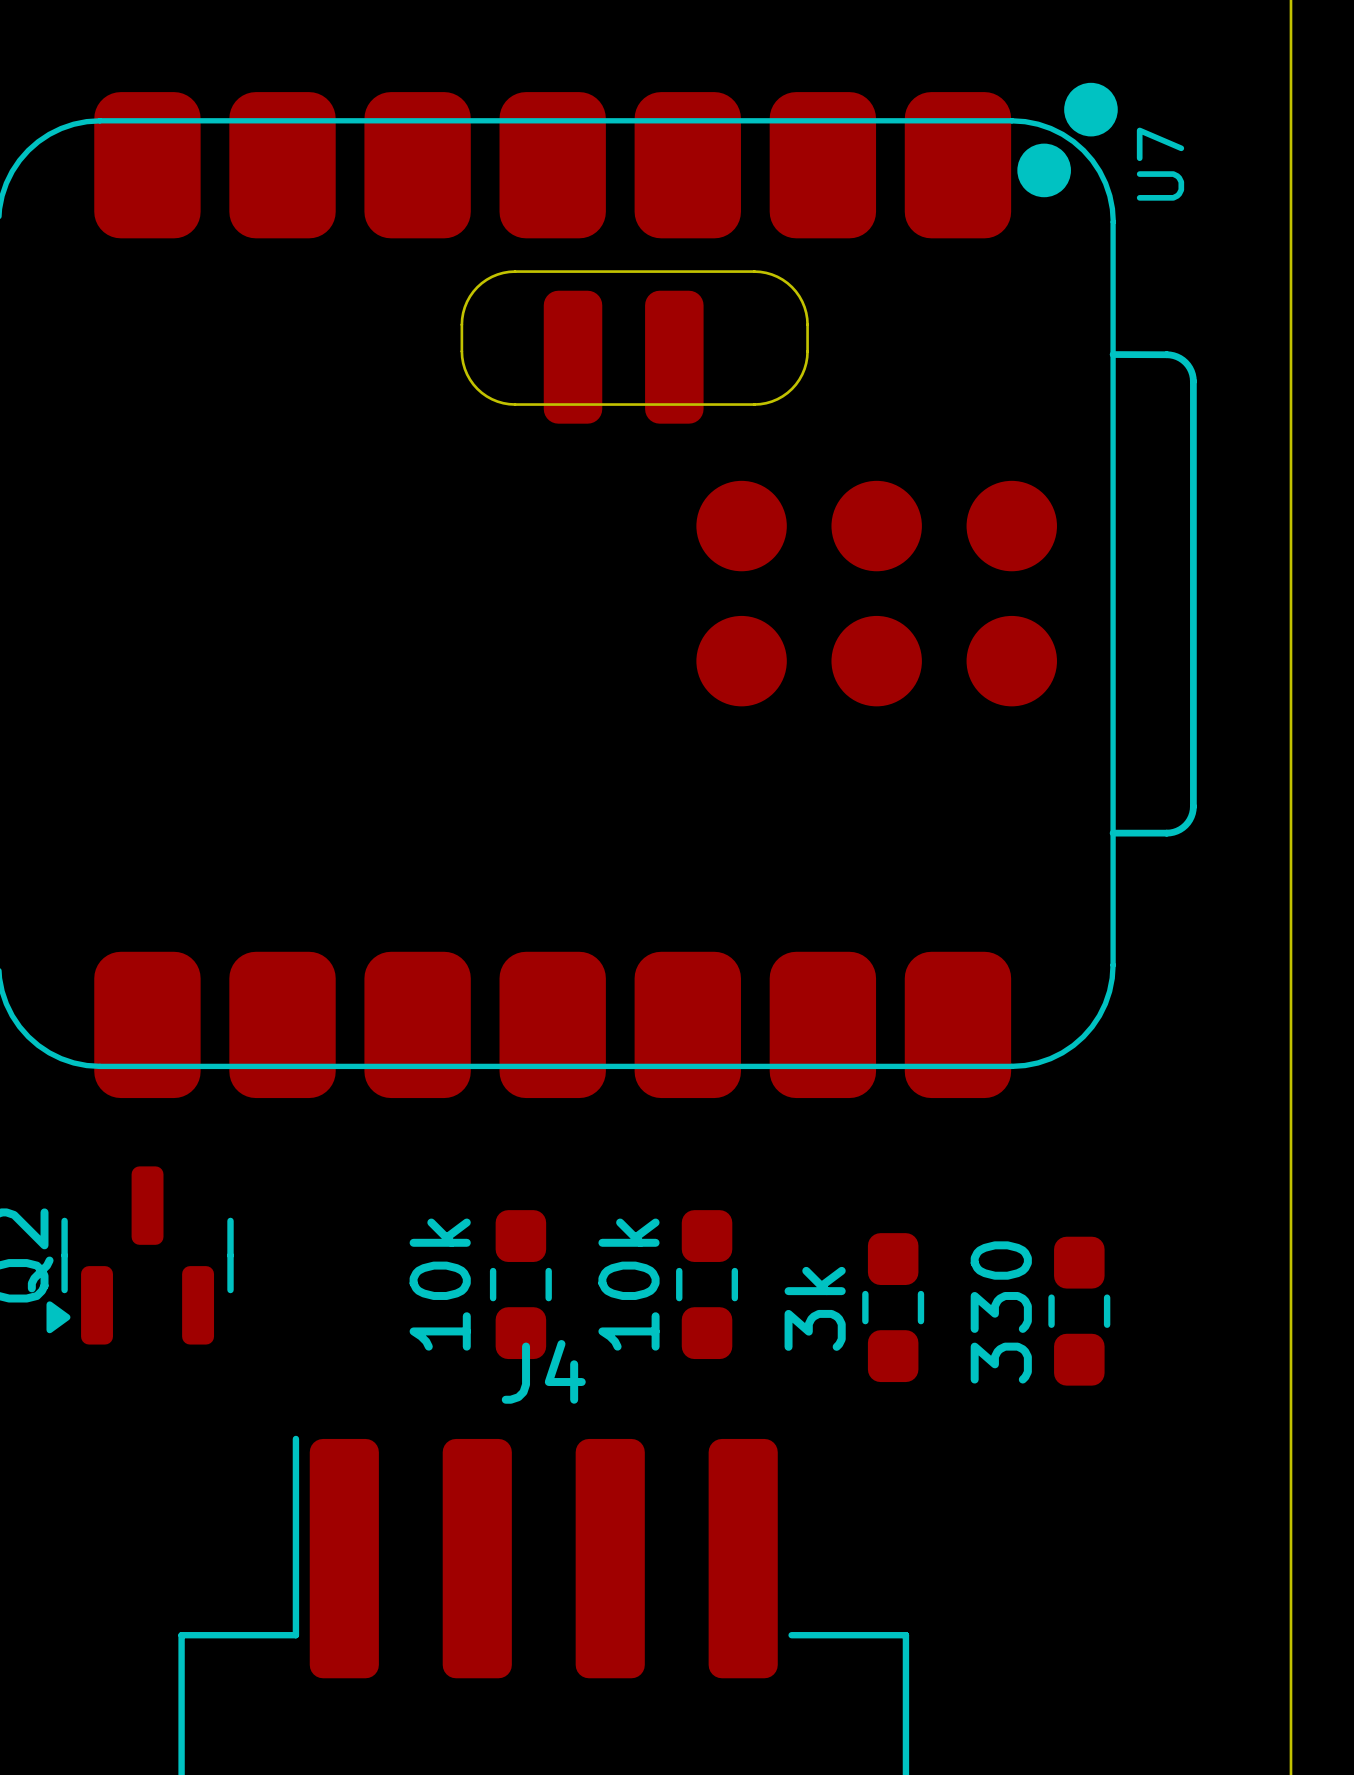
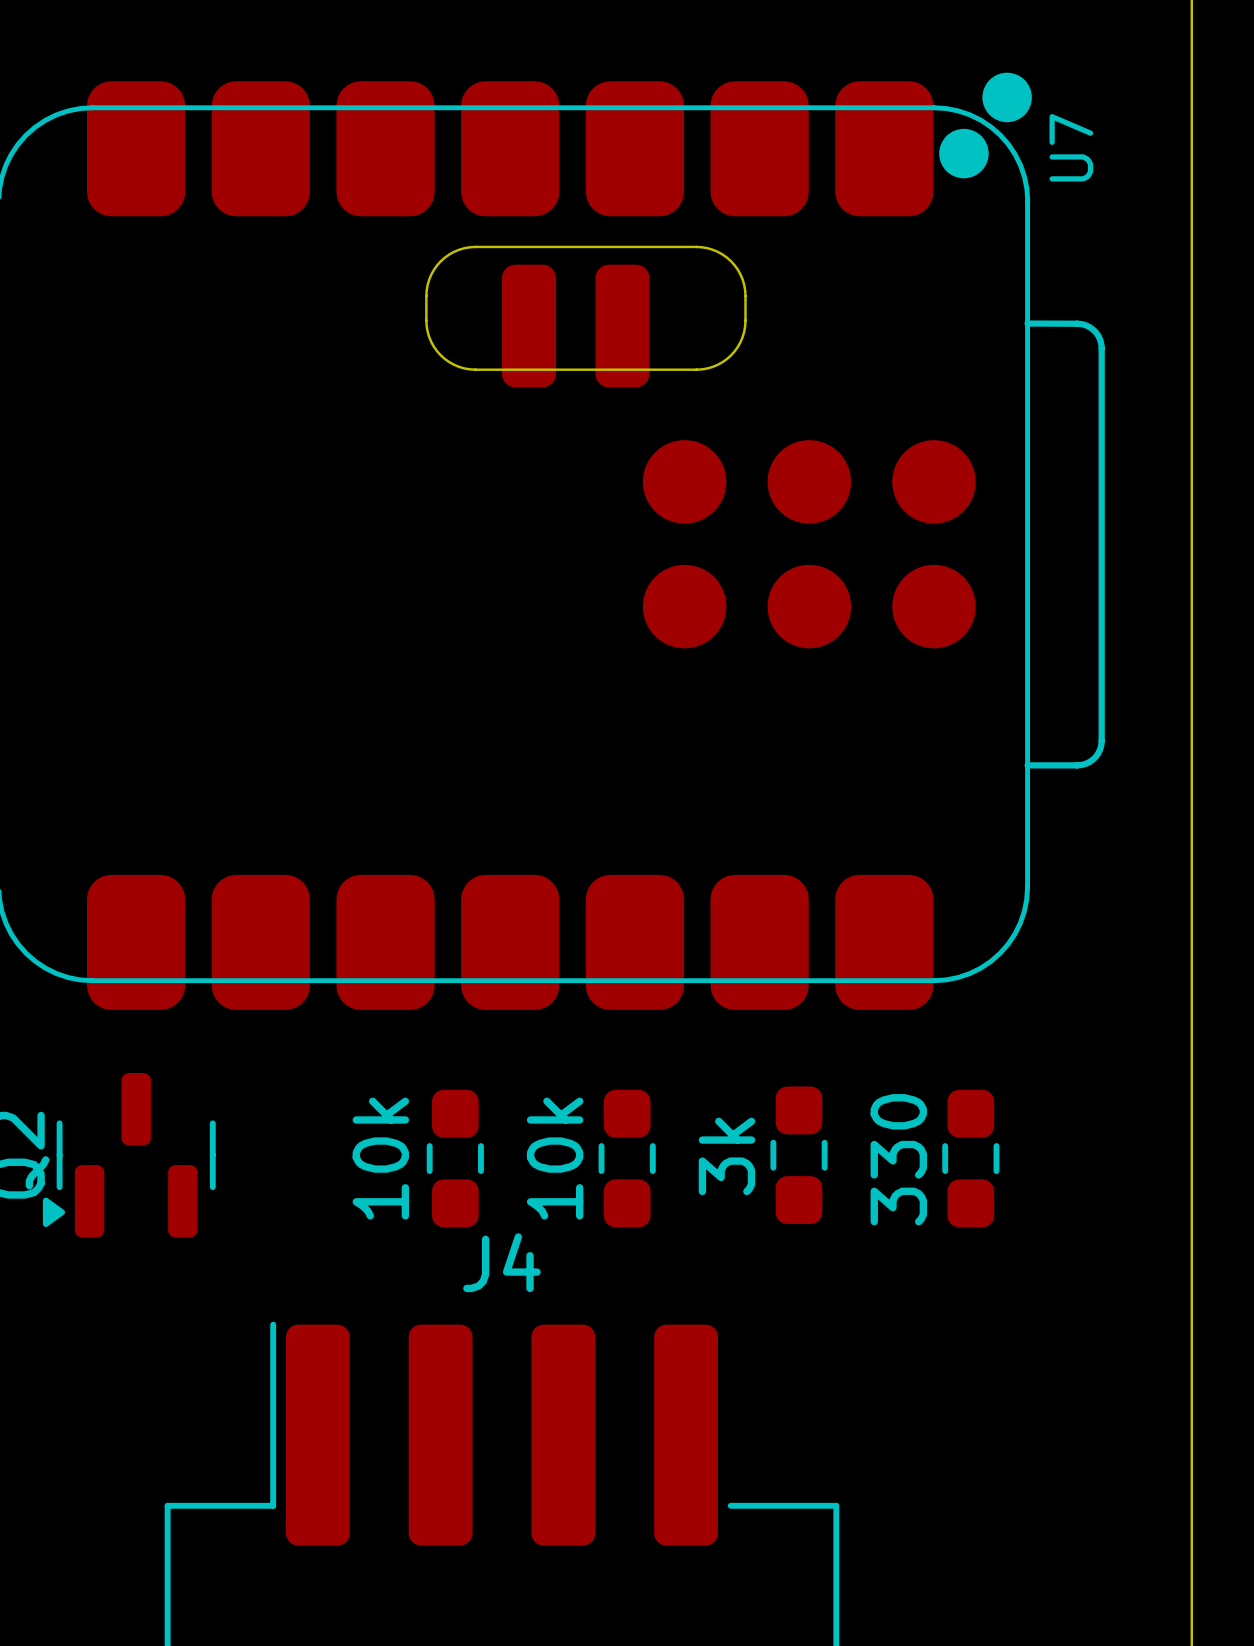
part position: (520, 1284) -> (455, 1158)
part position: (707, 1284) -> (627, 1158)
part position: (893, 1307) -> (799, 1155)
part position: (1079, 1311) -> (970, 1158)

